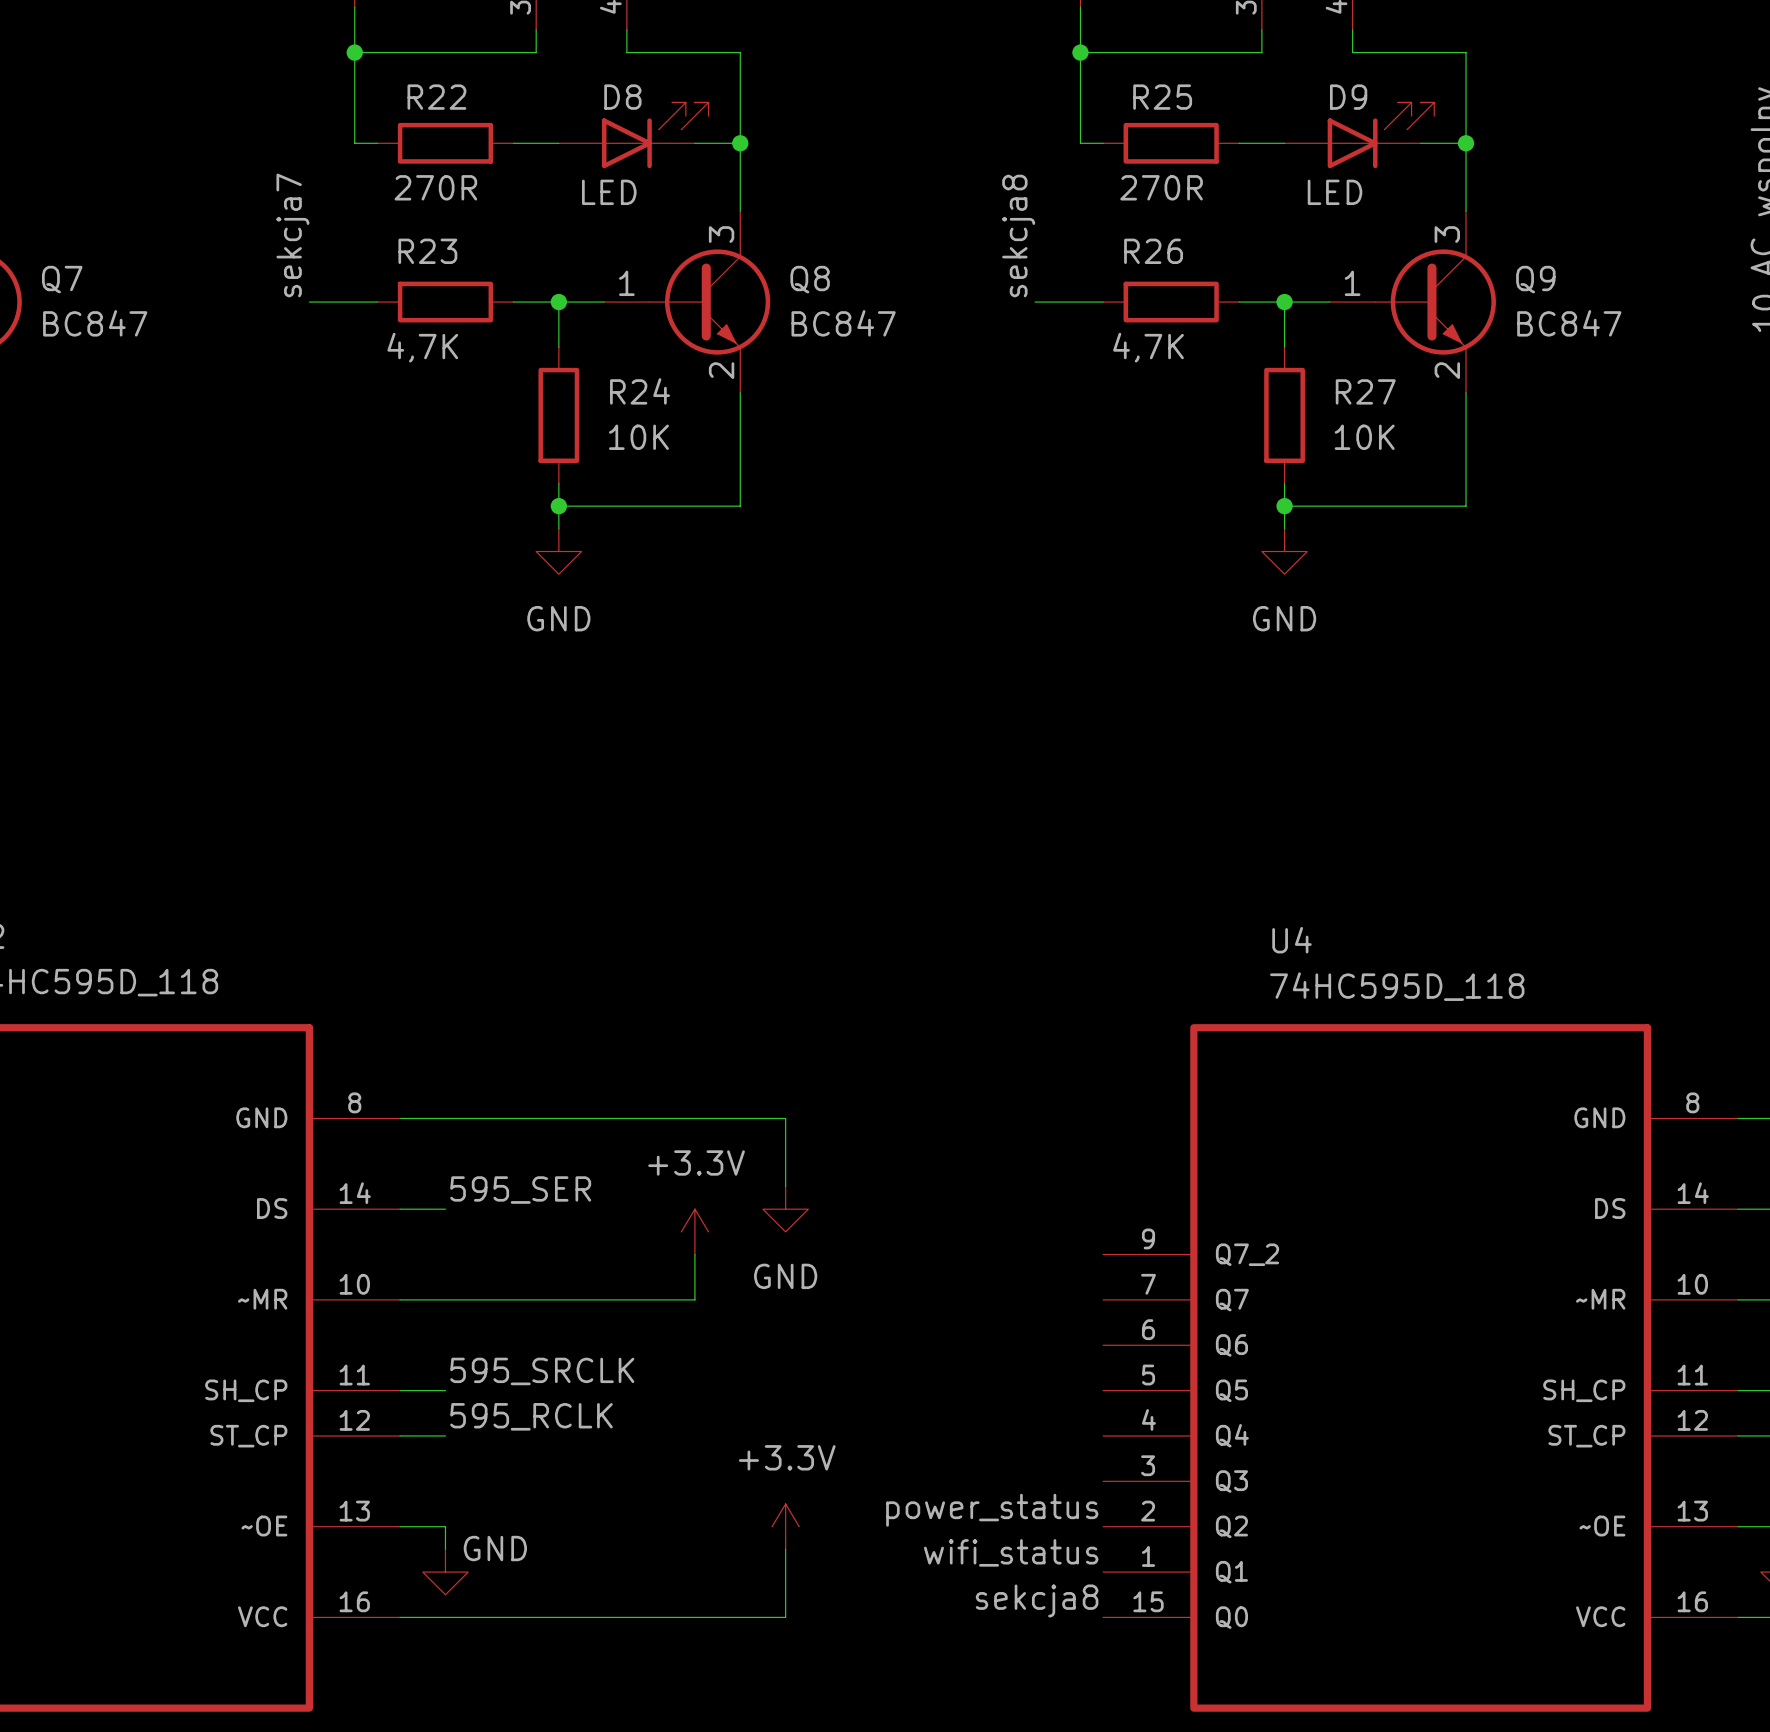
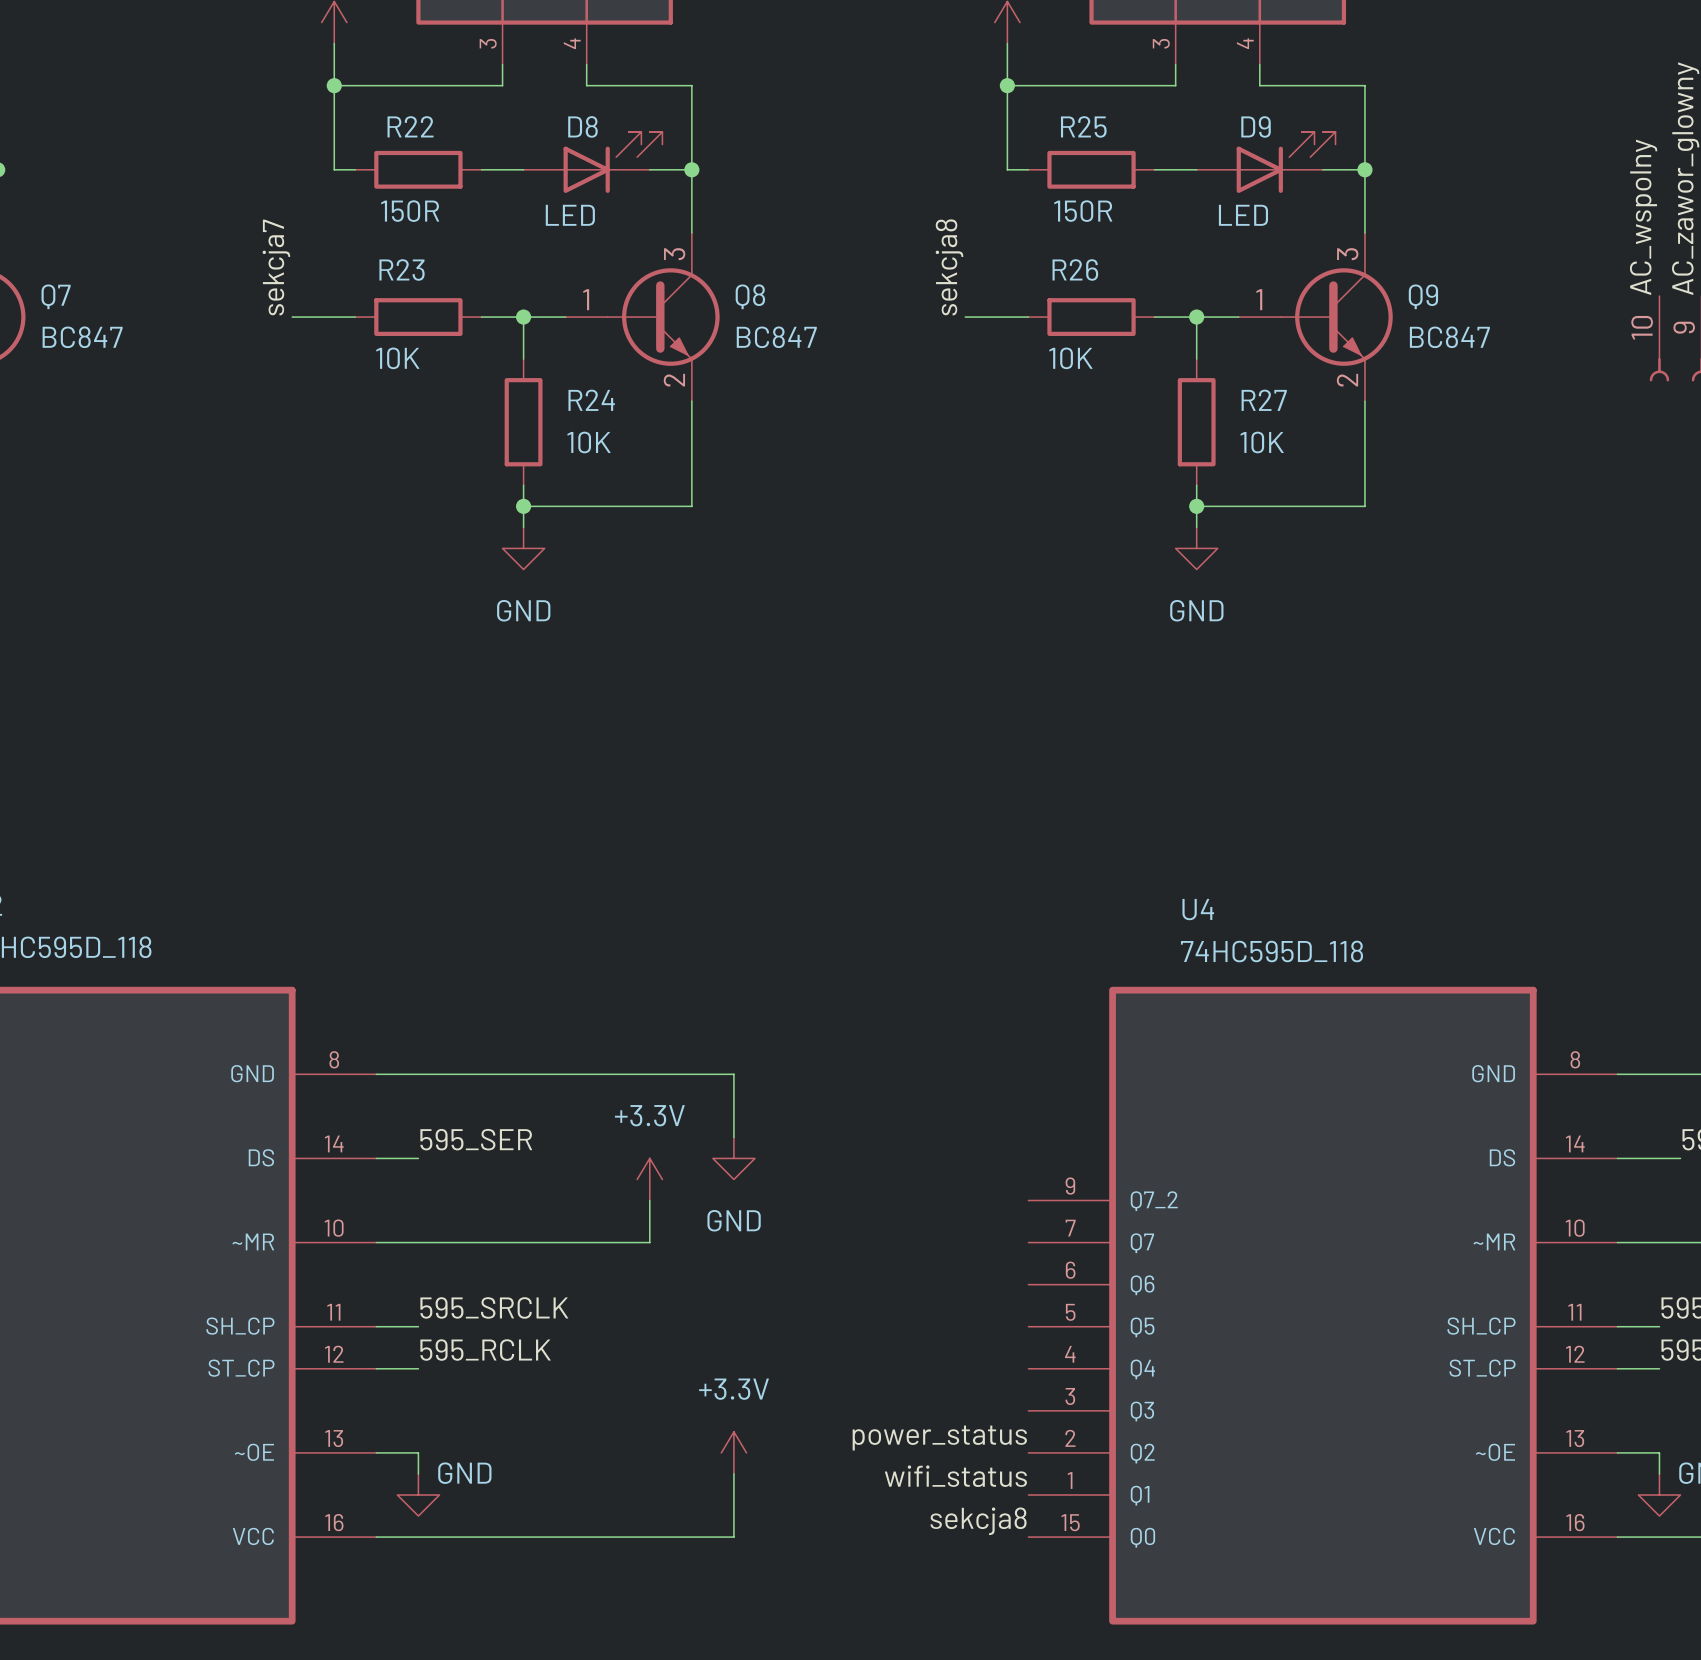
R22 value: 270R (435, 187) -> 150R (410, 211)
R25 value: 270R (1161, 187) -> 150R (1083, 211)
R23 value: 4,7K (422, 347) -> 10K (397, 358)
R26 value: 4,7K (1148, 347) -> 10K (1070, 358)

